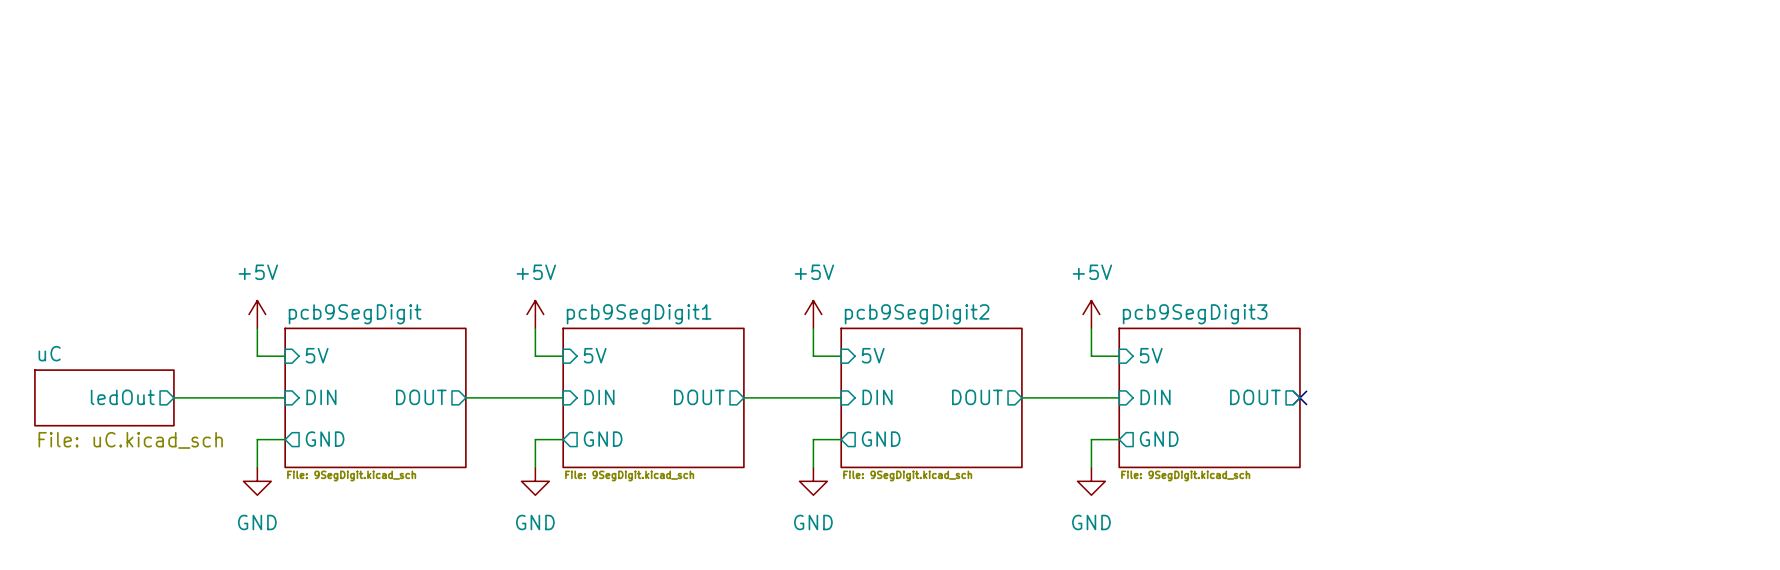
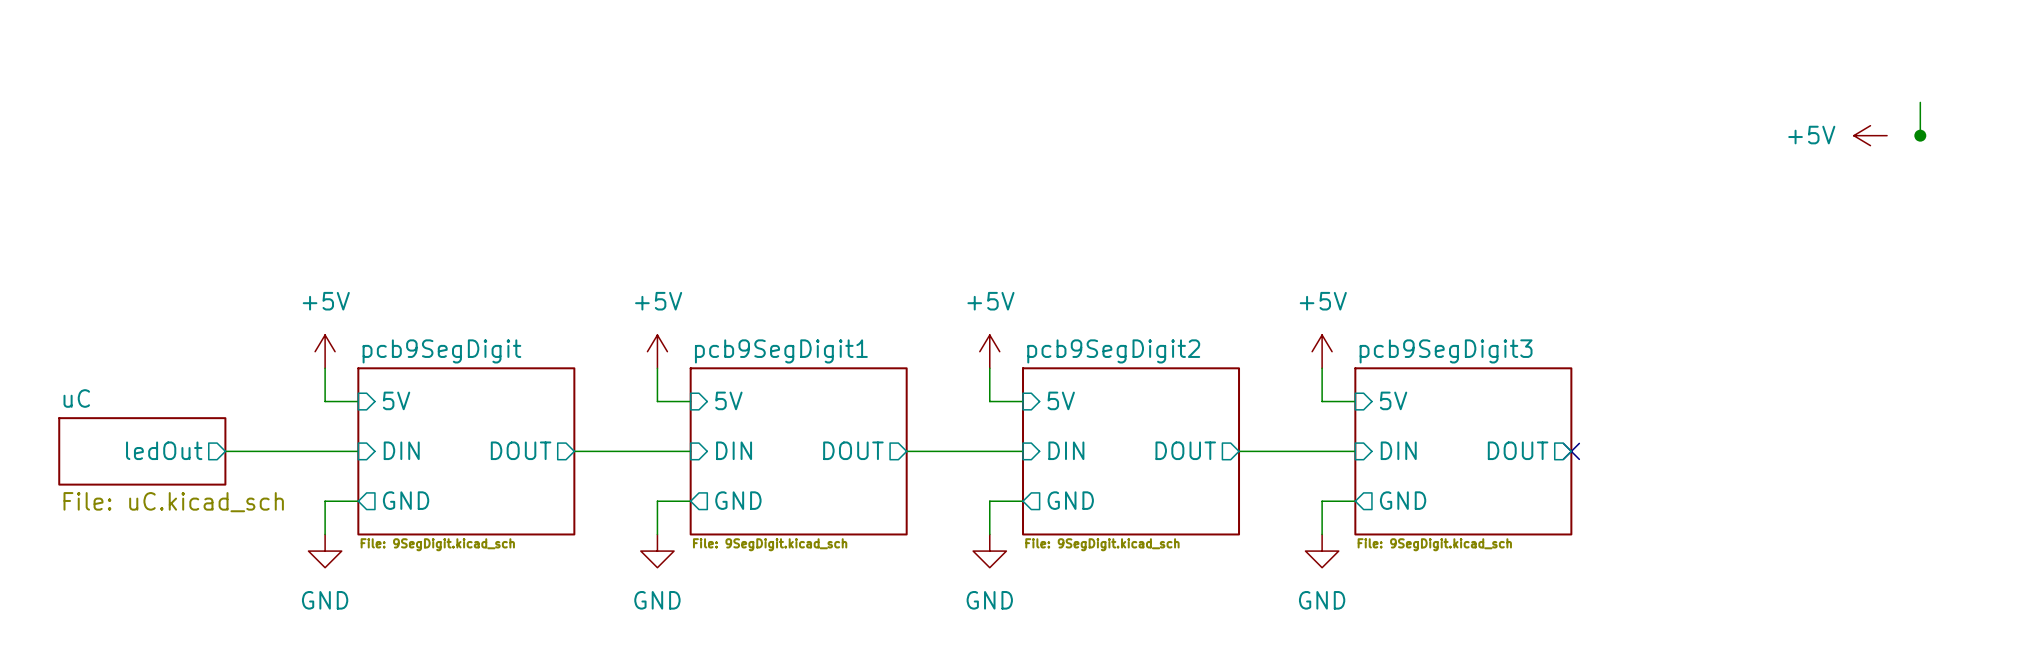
wire: none -> (1920, 102) (1920, 135)
power symbol: none -> +5V (1870, 135)
junction: none -> (1920, 135)

